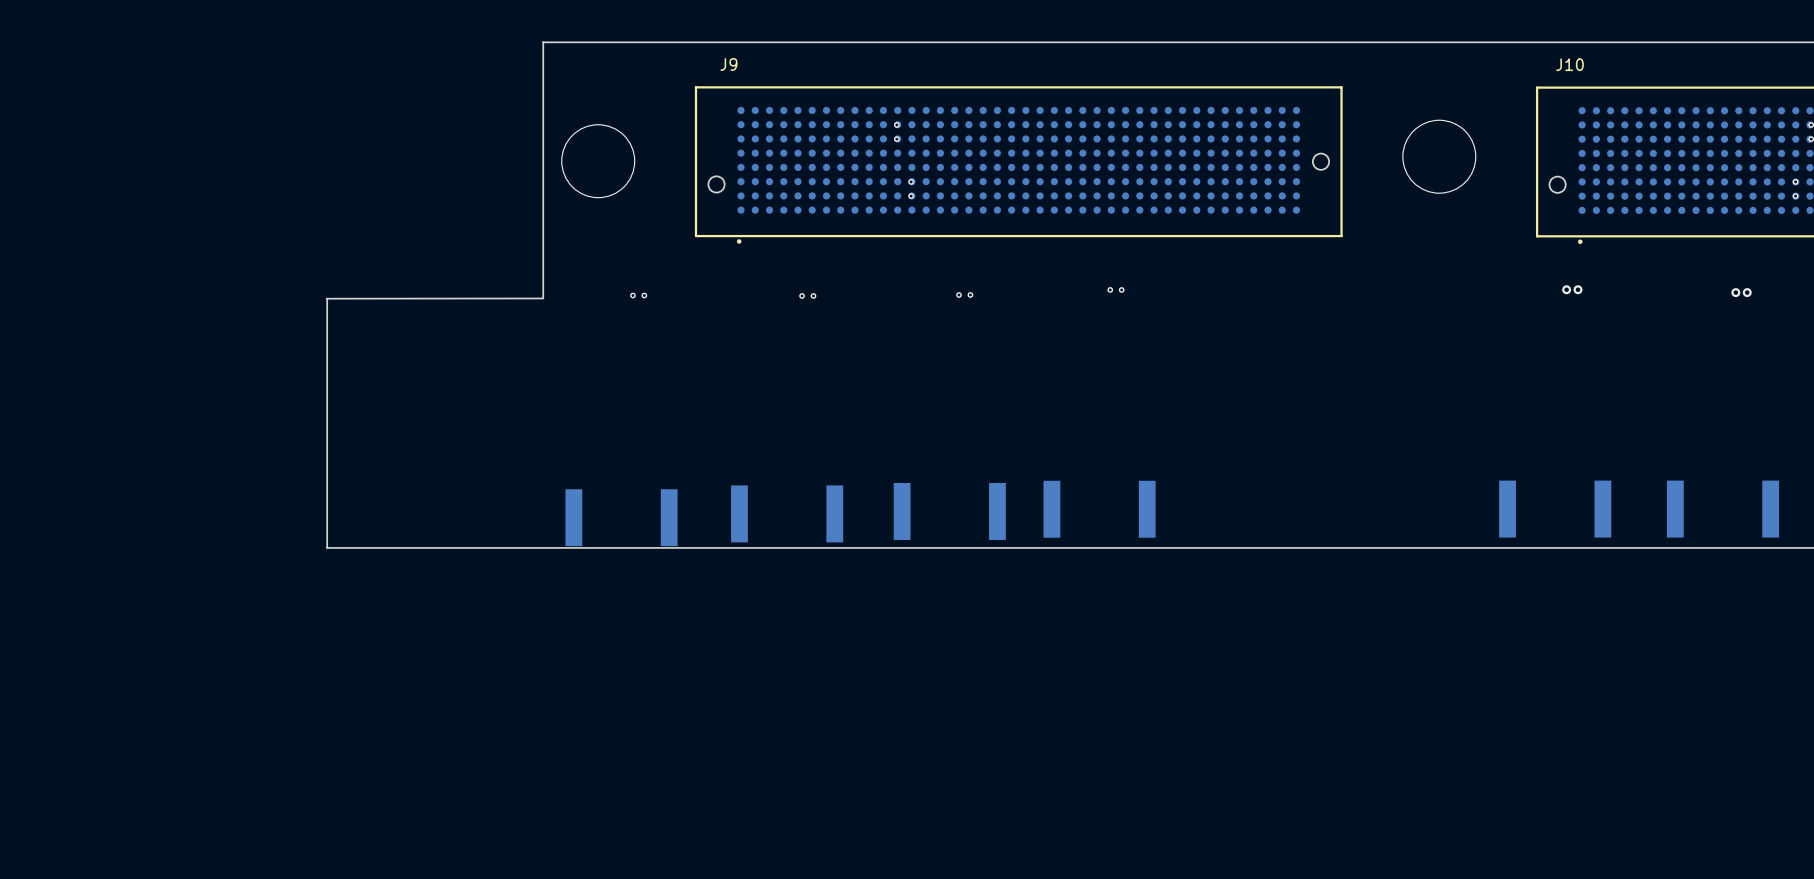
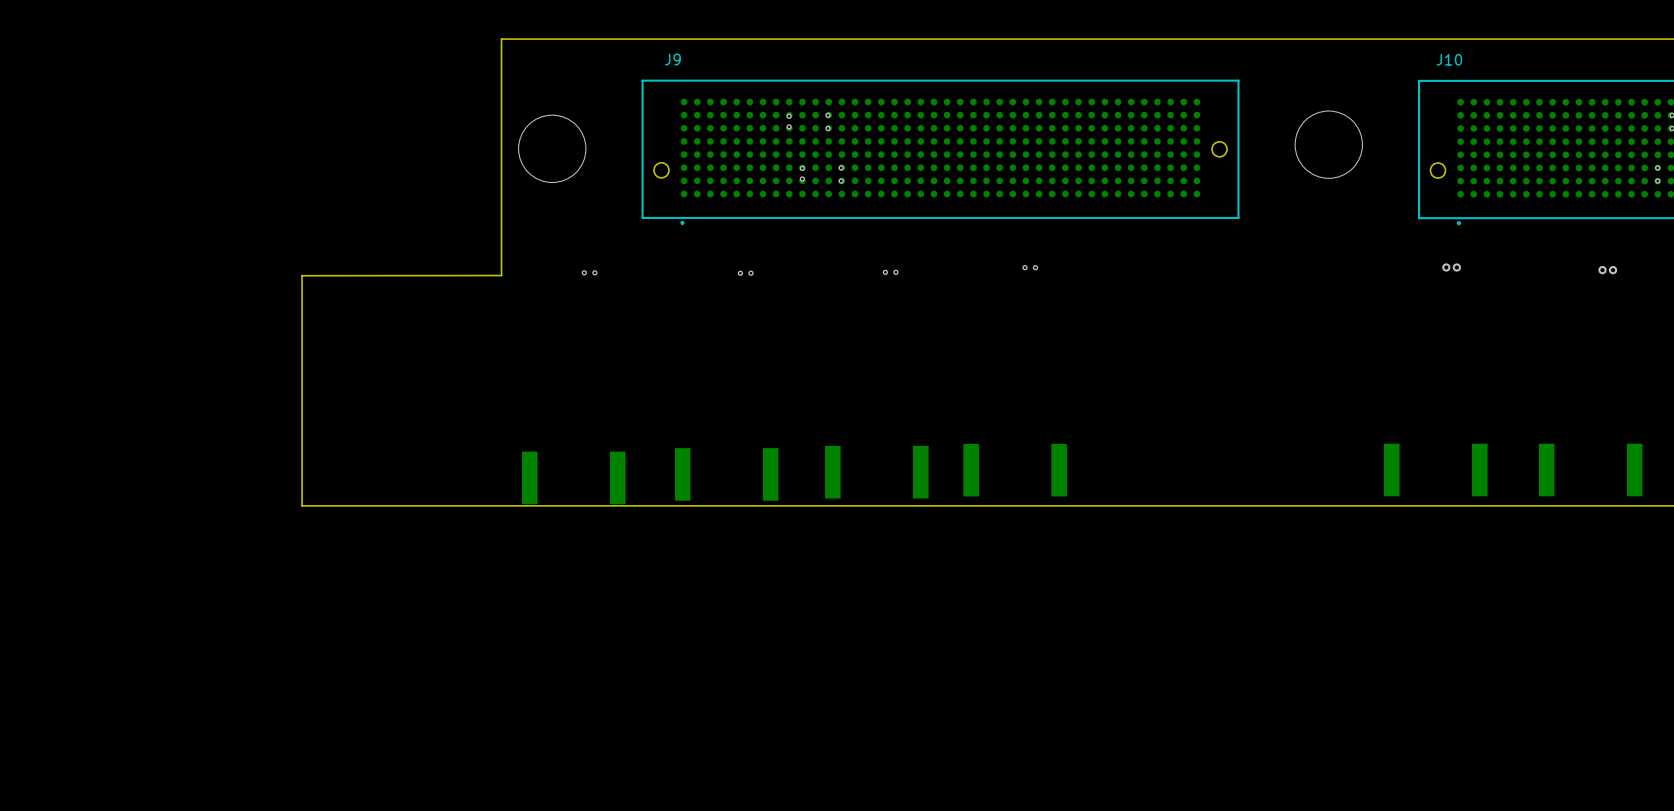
via: none -> (789, 116)
via: none -> (789, 126)
via: none -> (802, 168)
via: none -> (802, 178)

